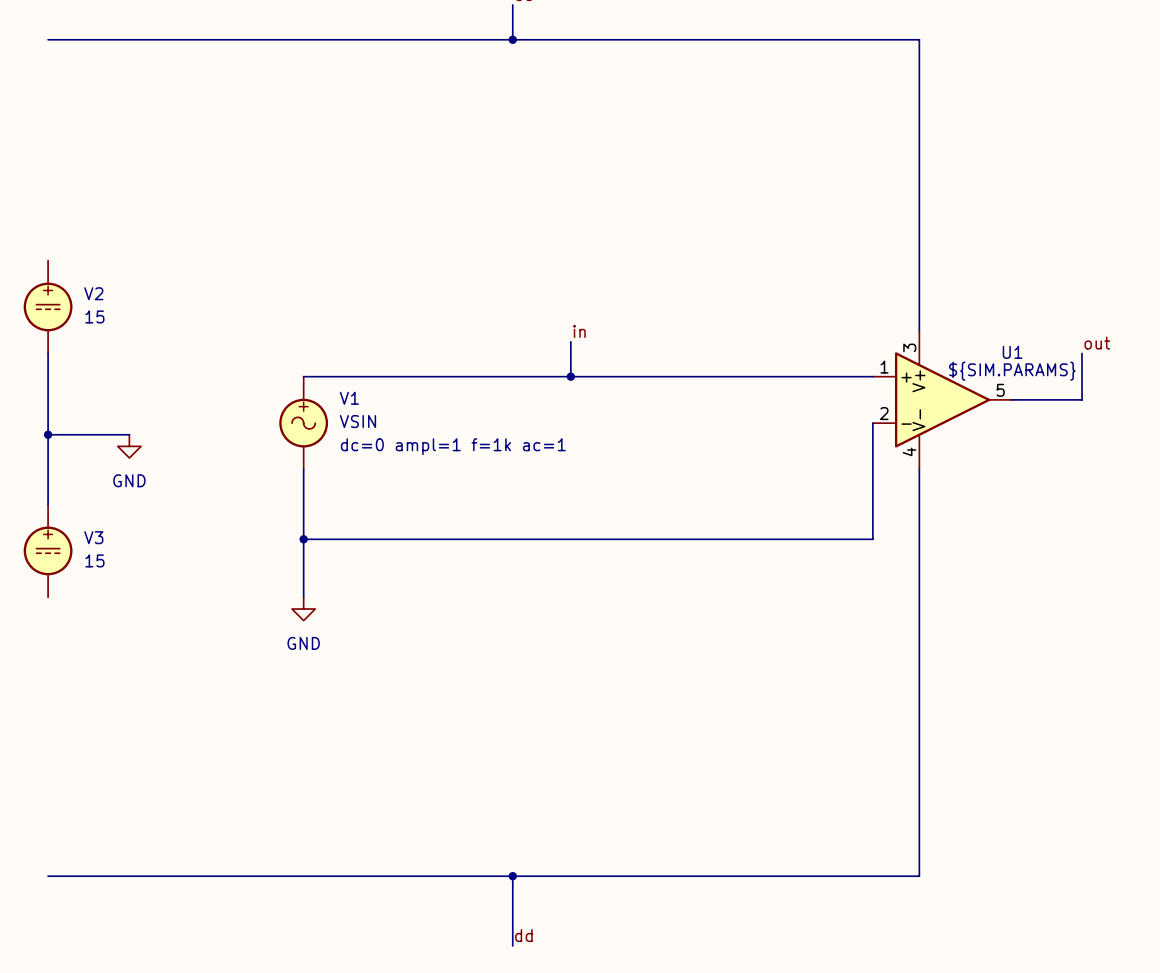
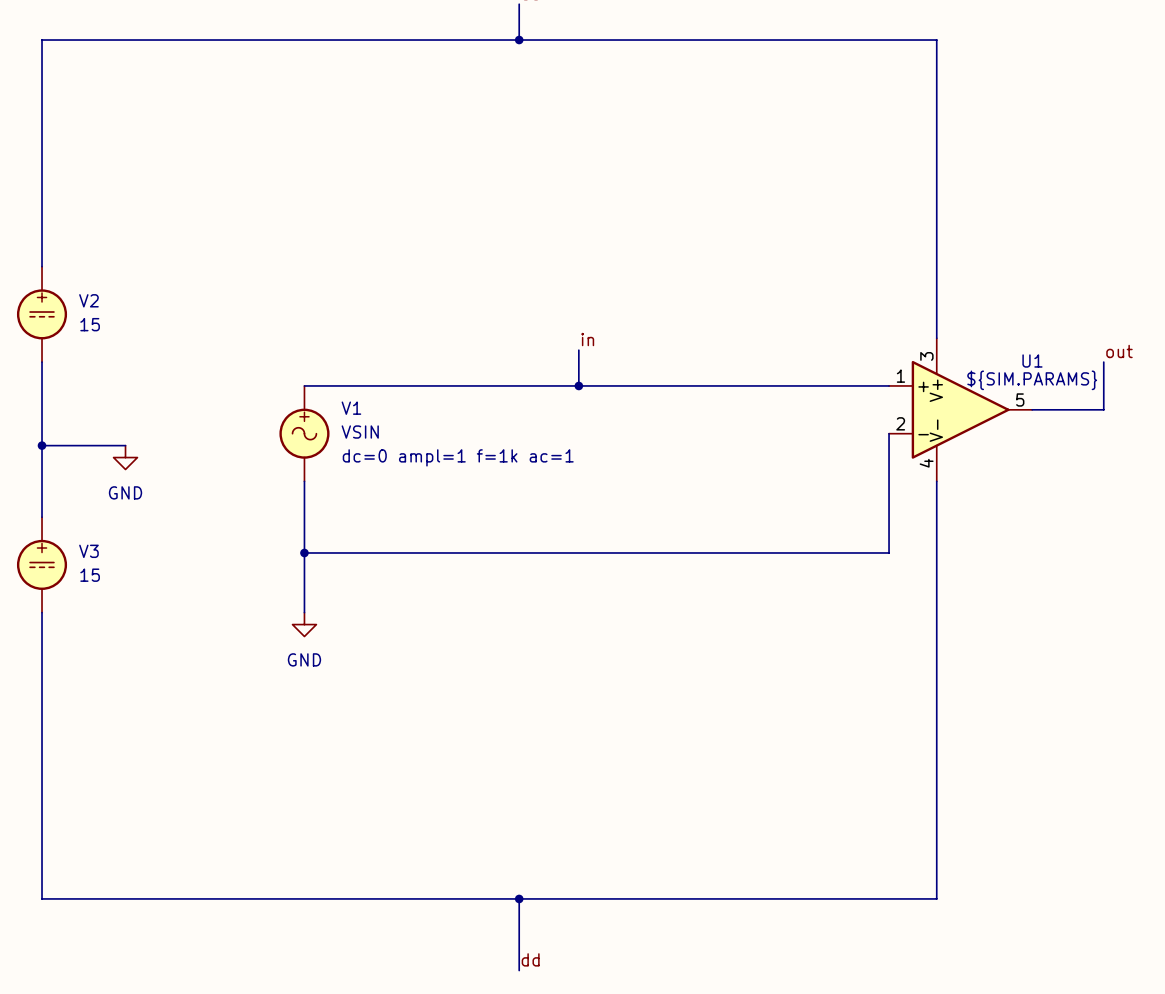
wire: none -> (42, 40) (42, 266)
wire: none -> (42, 612) (42, 898)

